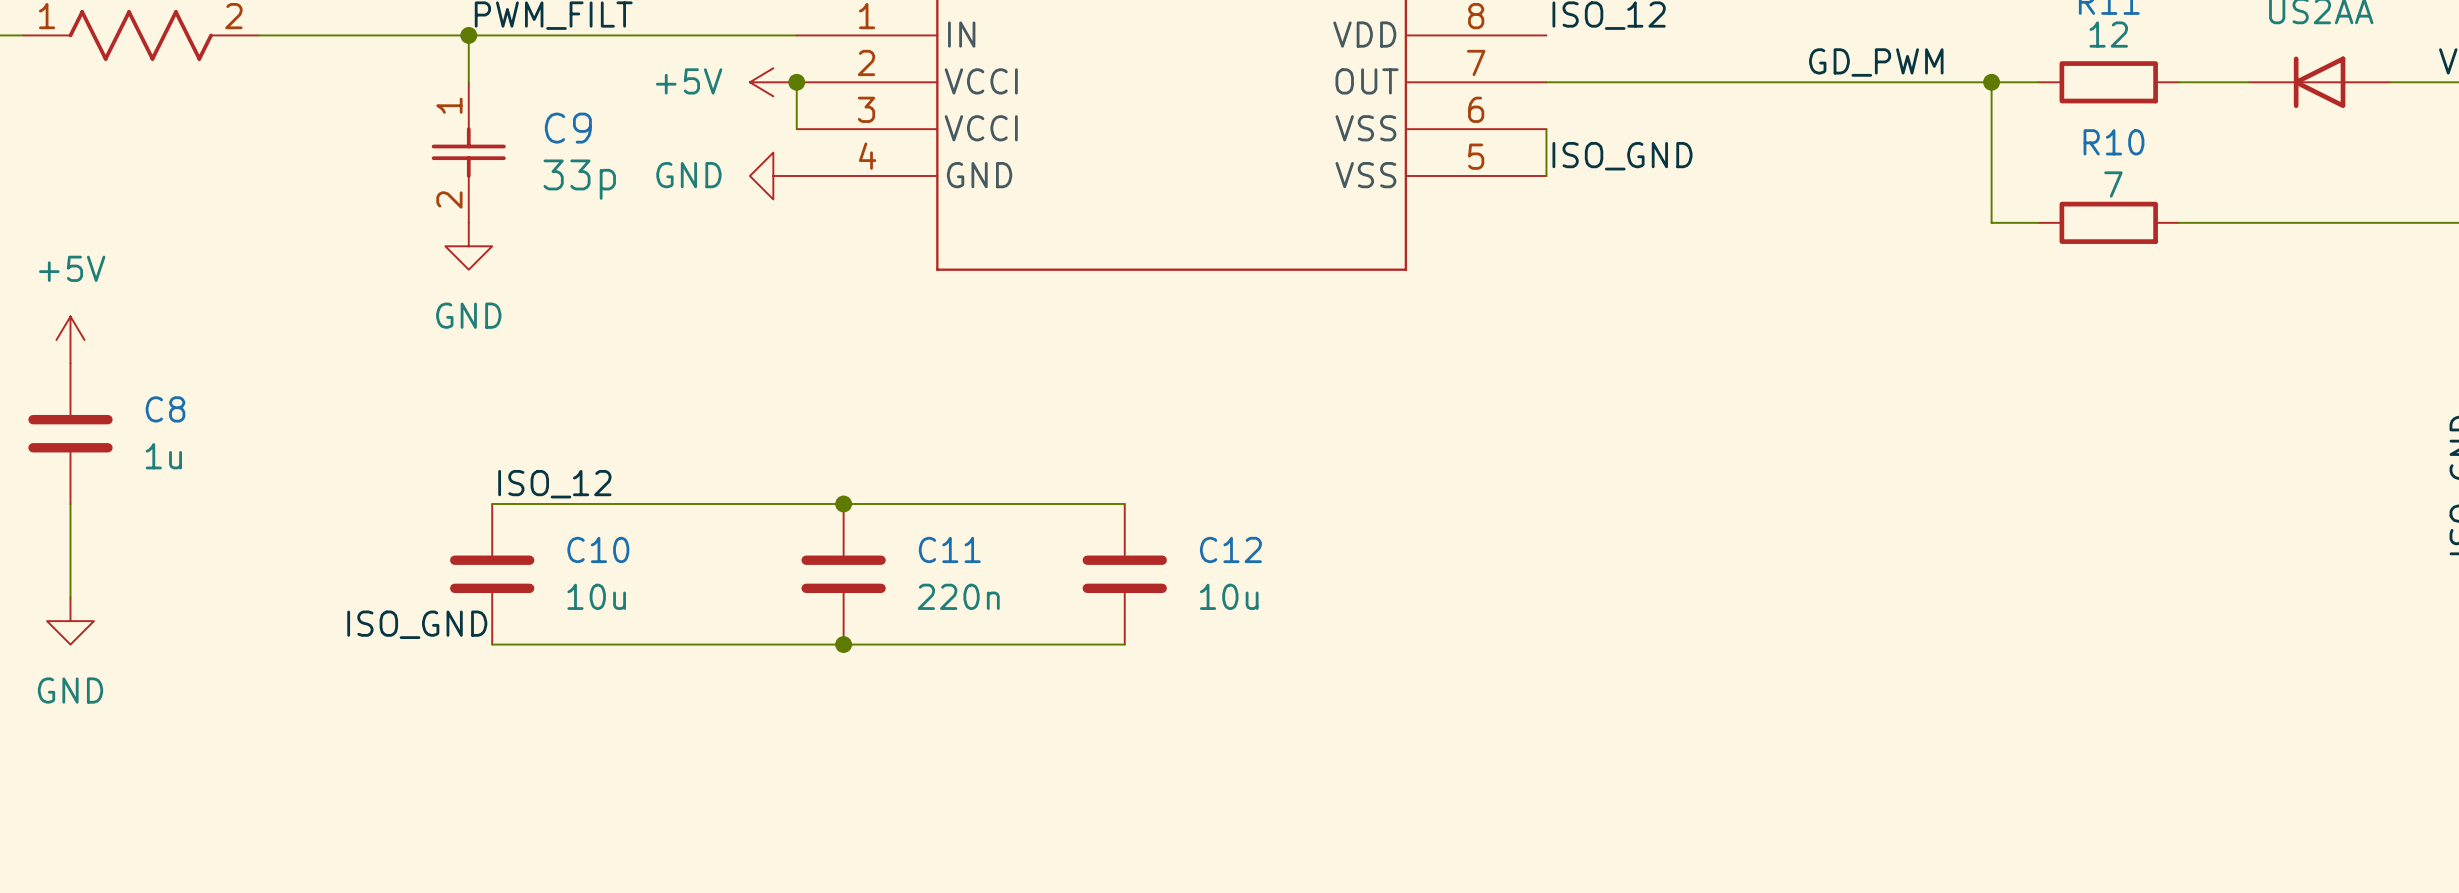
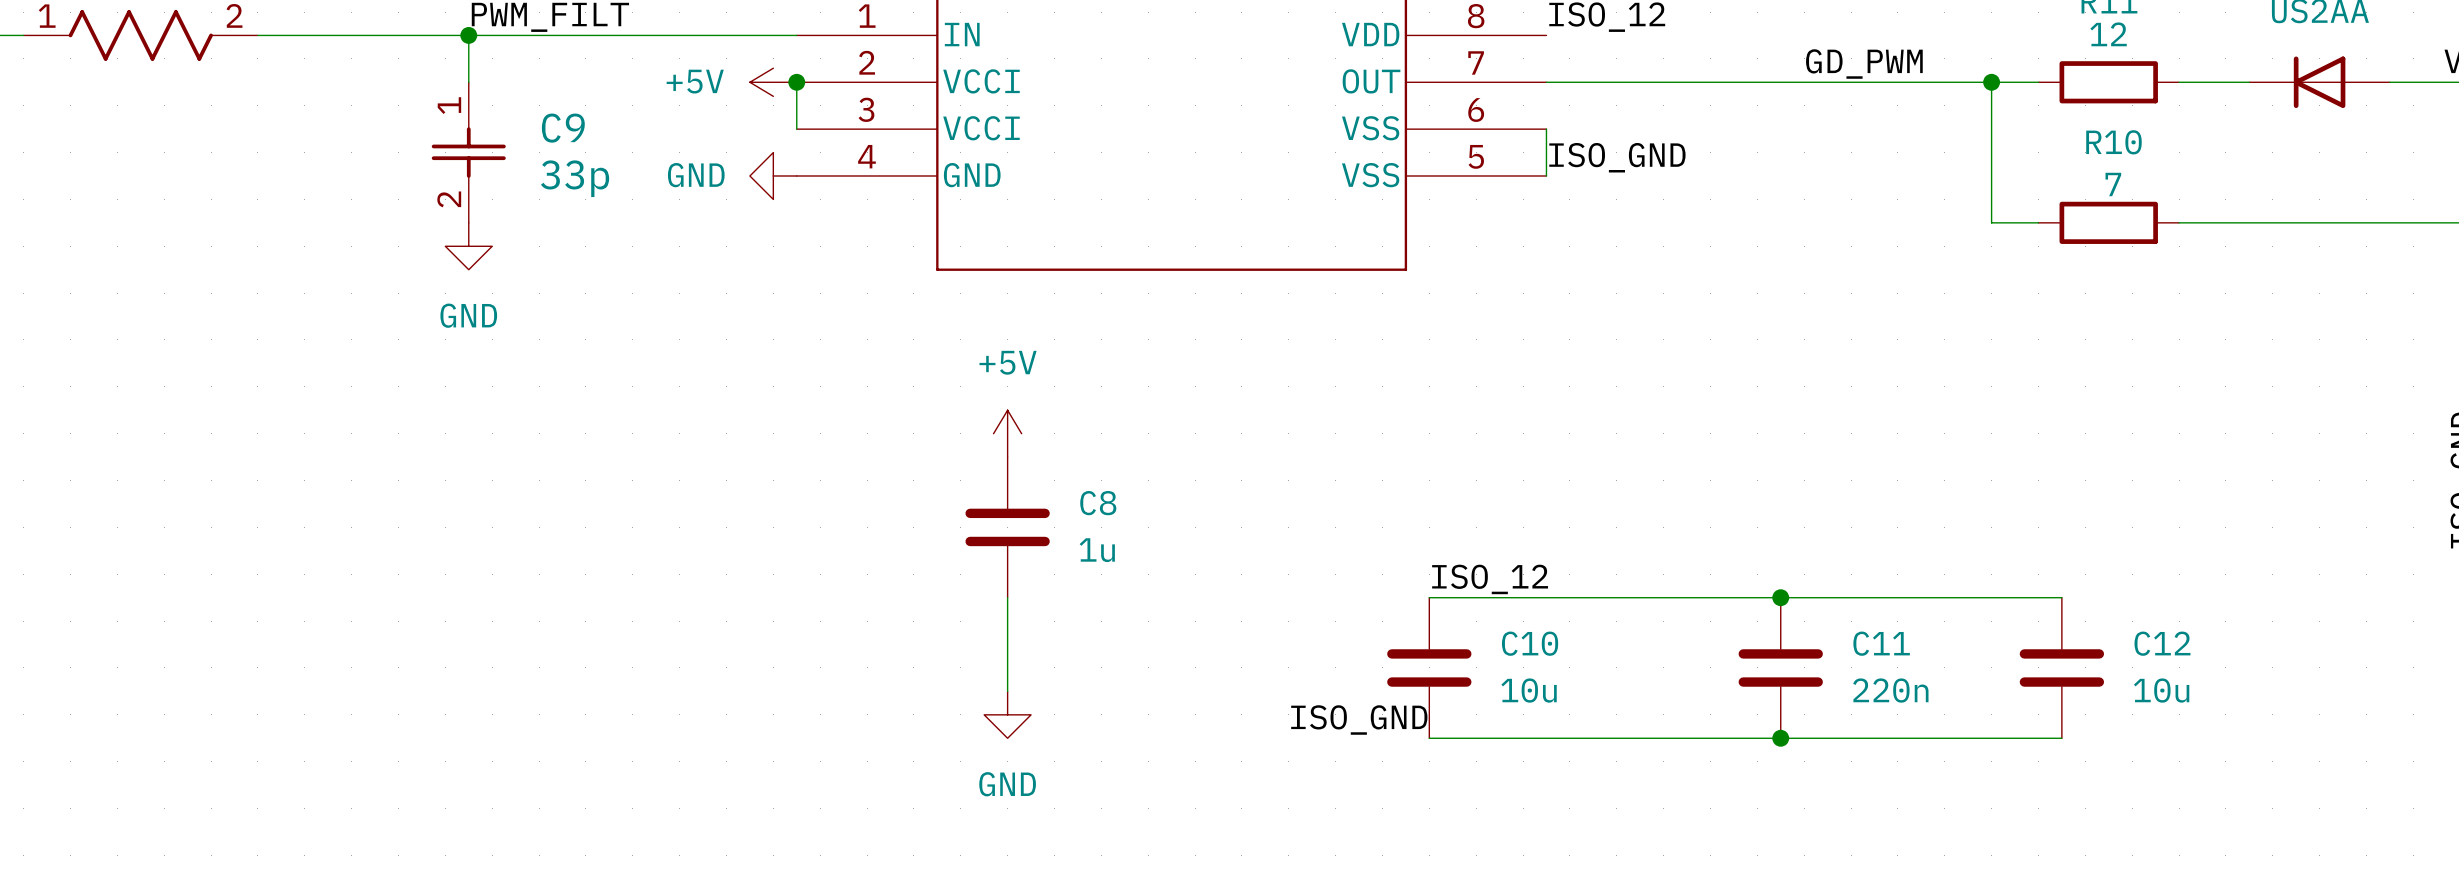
power symbol: +5V (70, 339) -> none
C8 position: (70, 433) -> (1007, 527)
power symbol: none -> +5V (1007, 433)
label: ISO_12 (554, 484) -> none
wire: (70, 503) (70, 597) -> none
wire: (492, 503) (1124, 503) -> none
junction: (843, 503) -> none
C10 position: (492, 574) -> (1429, 667)
C11 position: (843, 574) -> (1780, 667)
C12 position: (1124, 574) -> (2061, 667)
label: none -> ISO_12 (1490, 579)
wire: none -> (1007, 597) (1007, 691)
wire: none -> (1429, 597) (2061, 597)
junction: none -> (1780, 597)
power symbol: GND (70, 621) -> none
label: ISO_GND (417, 624) -> none
wire: (492, 644) (1124, 644) -> none
junction: (843, 644) -> none
power symbol: none -> GND (1007, 714)
label: none -> ISO_GND (1359, 720)
wire: none -> (1429, 738) (2061, 738)
junction: none -> (1780, 738)

